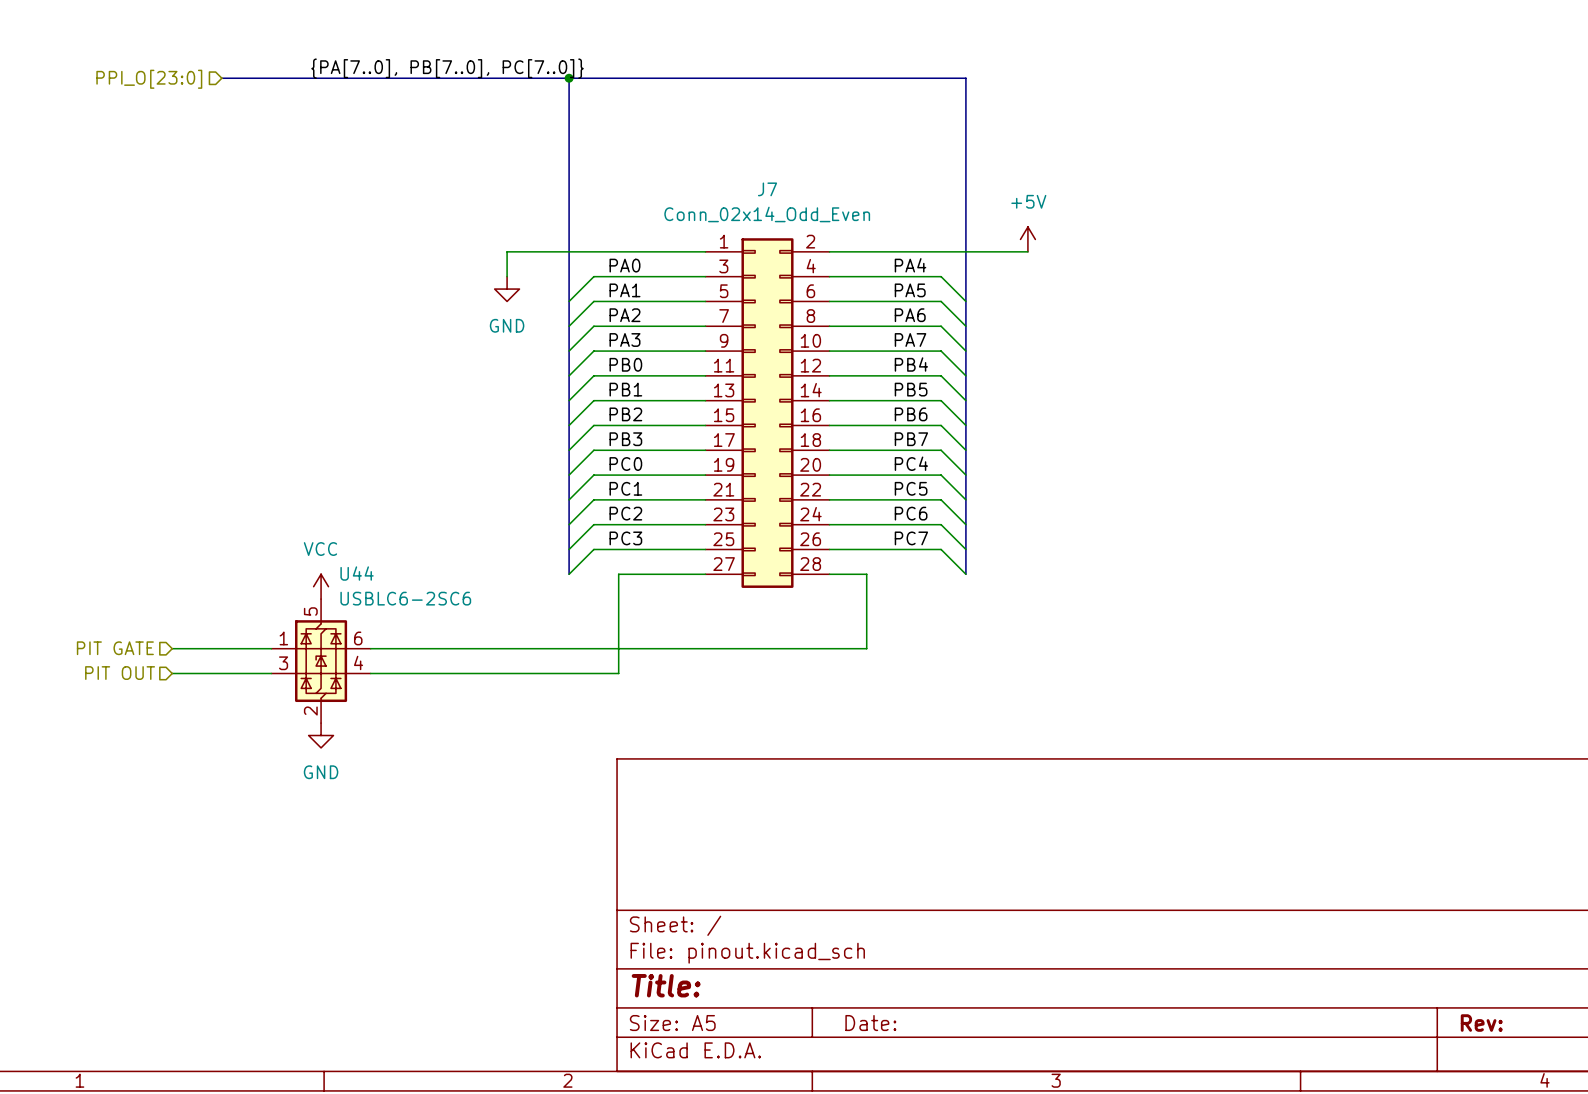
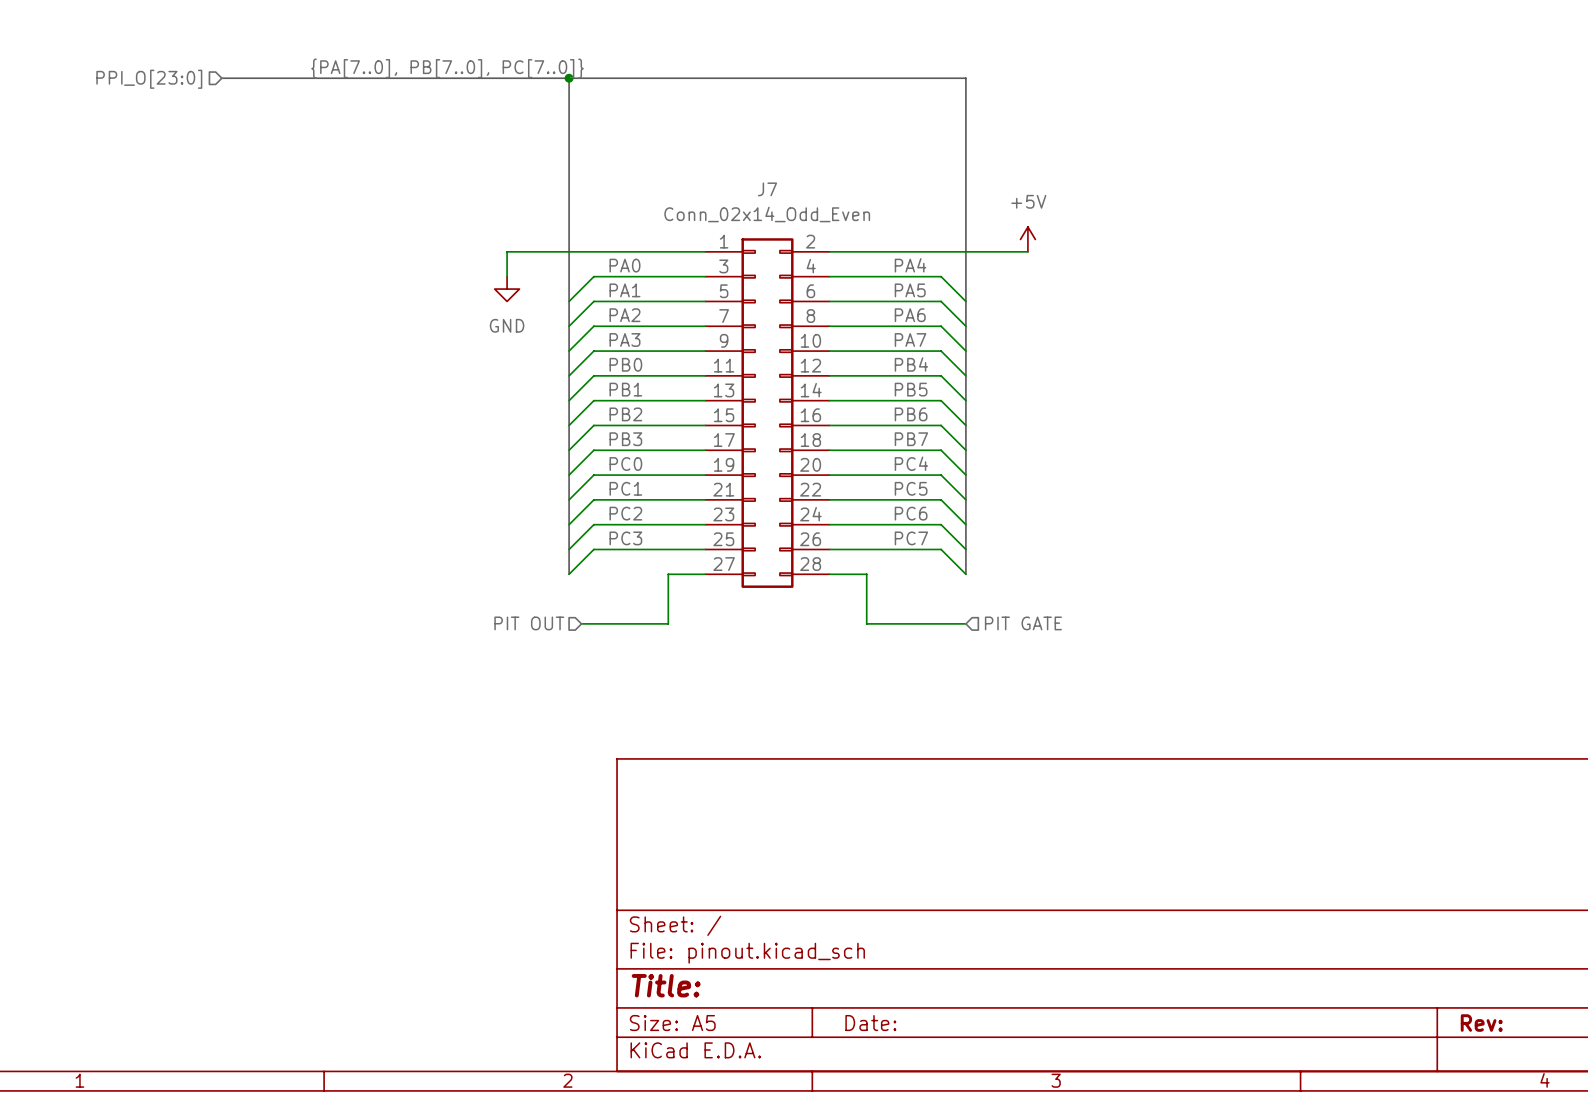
wire: (668, 574) (618, 574) (618, 673) (370, 673) -> (668, 574) (668, 623) (581, 623)
power symbol: VCC (321, 586) -> none
hierarchical label: none -> PIT OUT (529, 623)
wire: (866, 623) (866, 648) (370, 648) -> (866, 623) (965, 623)
hierarchical label: none -> PIT GATE (1023, 623)
hierarchical label: PIT GATE (115, 648) -> none
wire: (172, 648) (271, 648) -> none
U44: USBLC6-2SC6 (321, 661) -> none
hierarchical label: PIT OUT (120, 673) -> none
wire: (172, 673) (271, 673) -> none
power symbol: GND (321, 735) -> none

